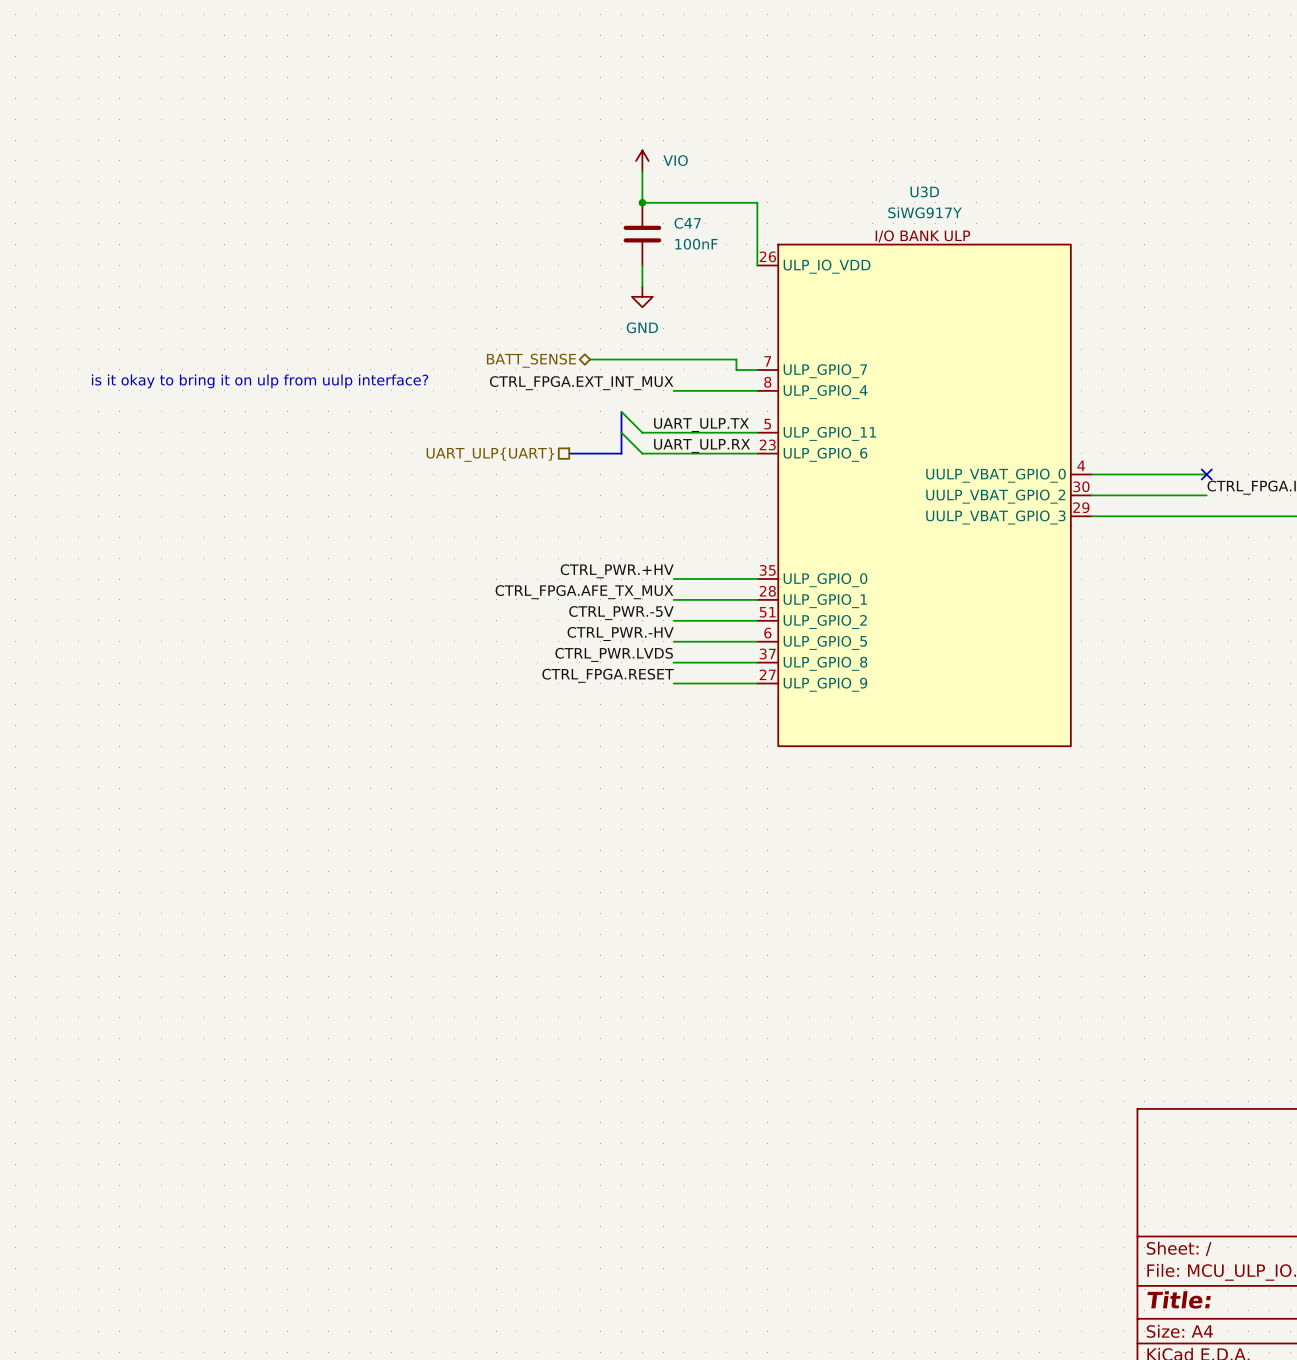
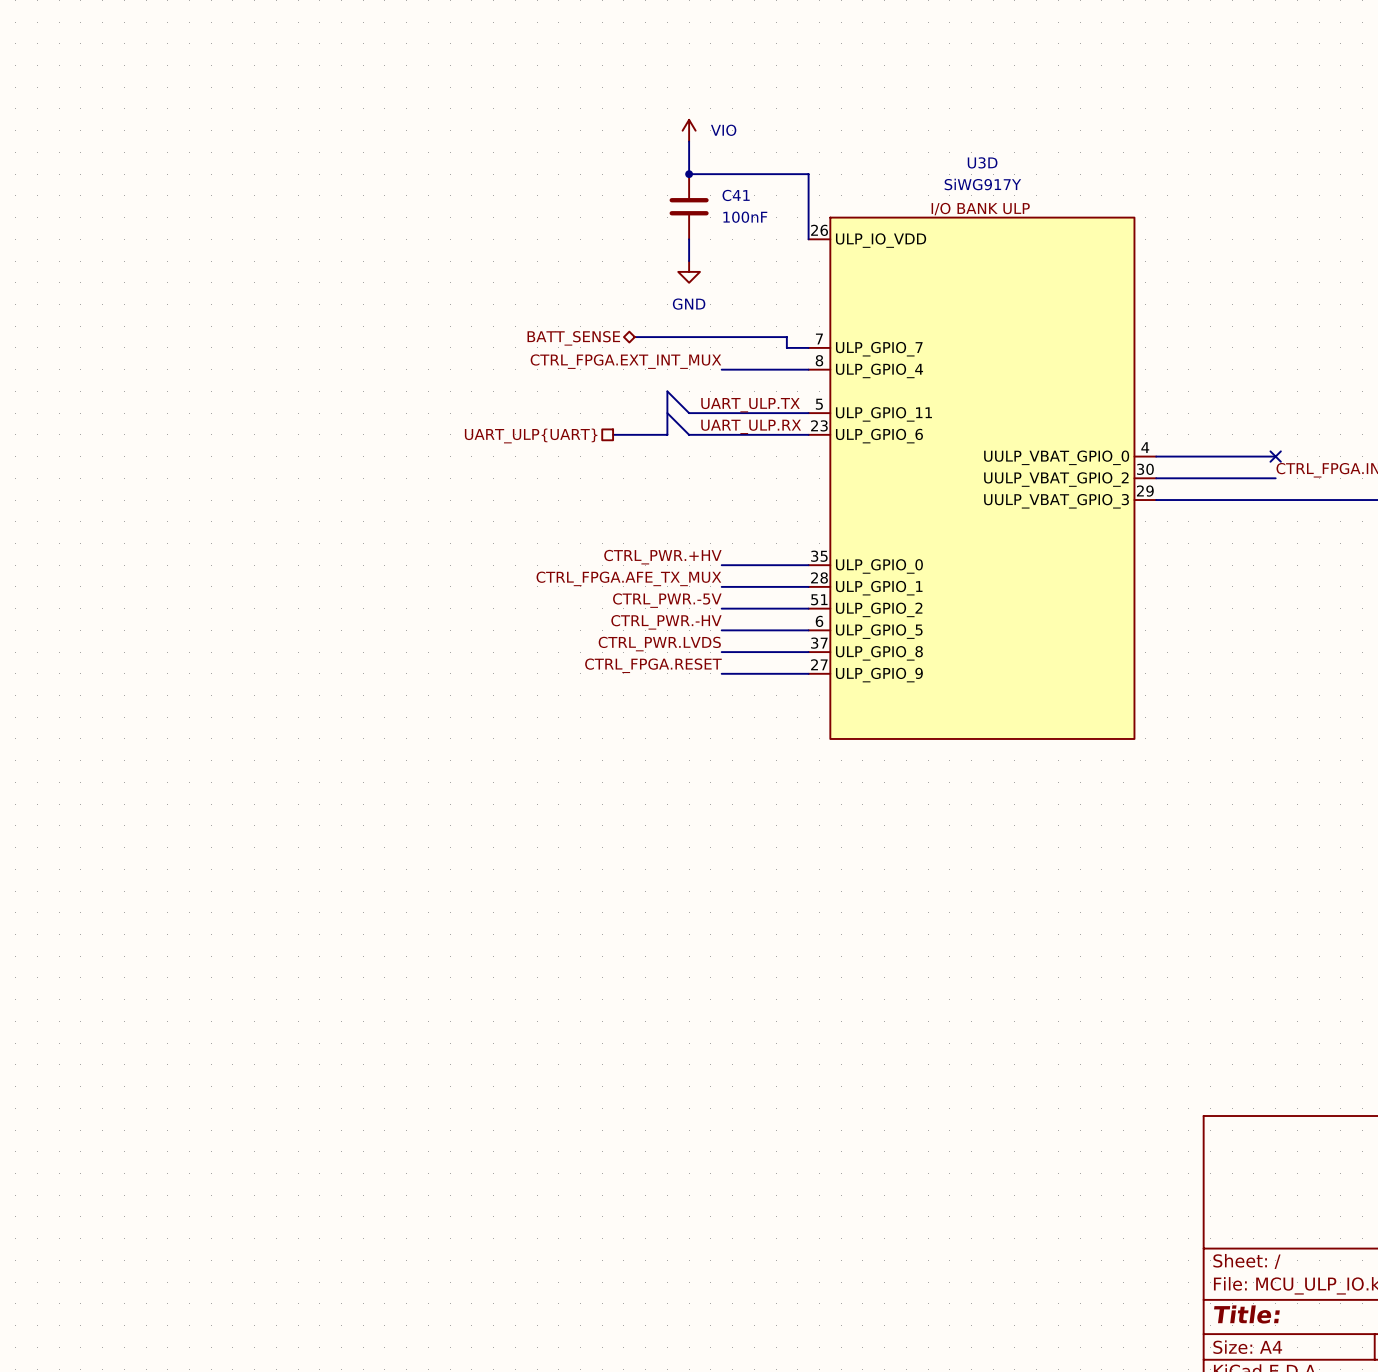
C47 name: C47 (687, 223) -> C41 (736, 195)
text: is it okay to bring it on ulp from uulp interface? (260, 381) -> none

